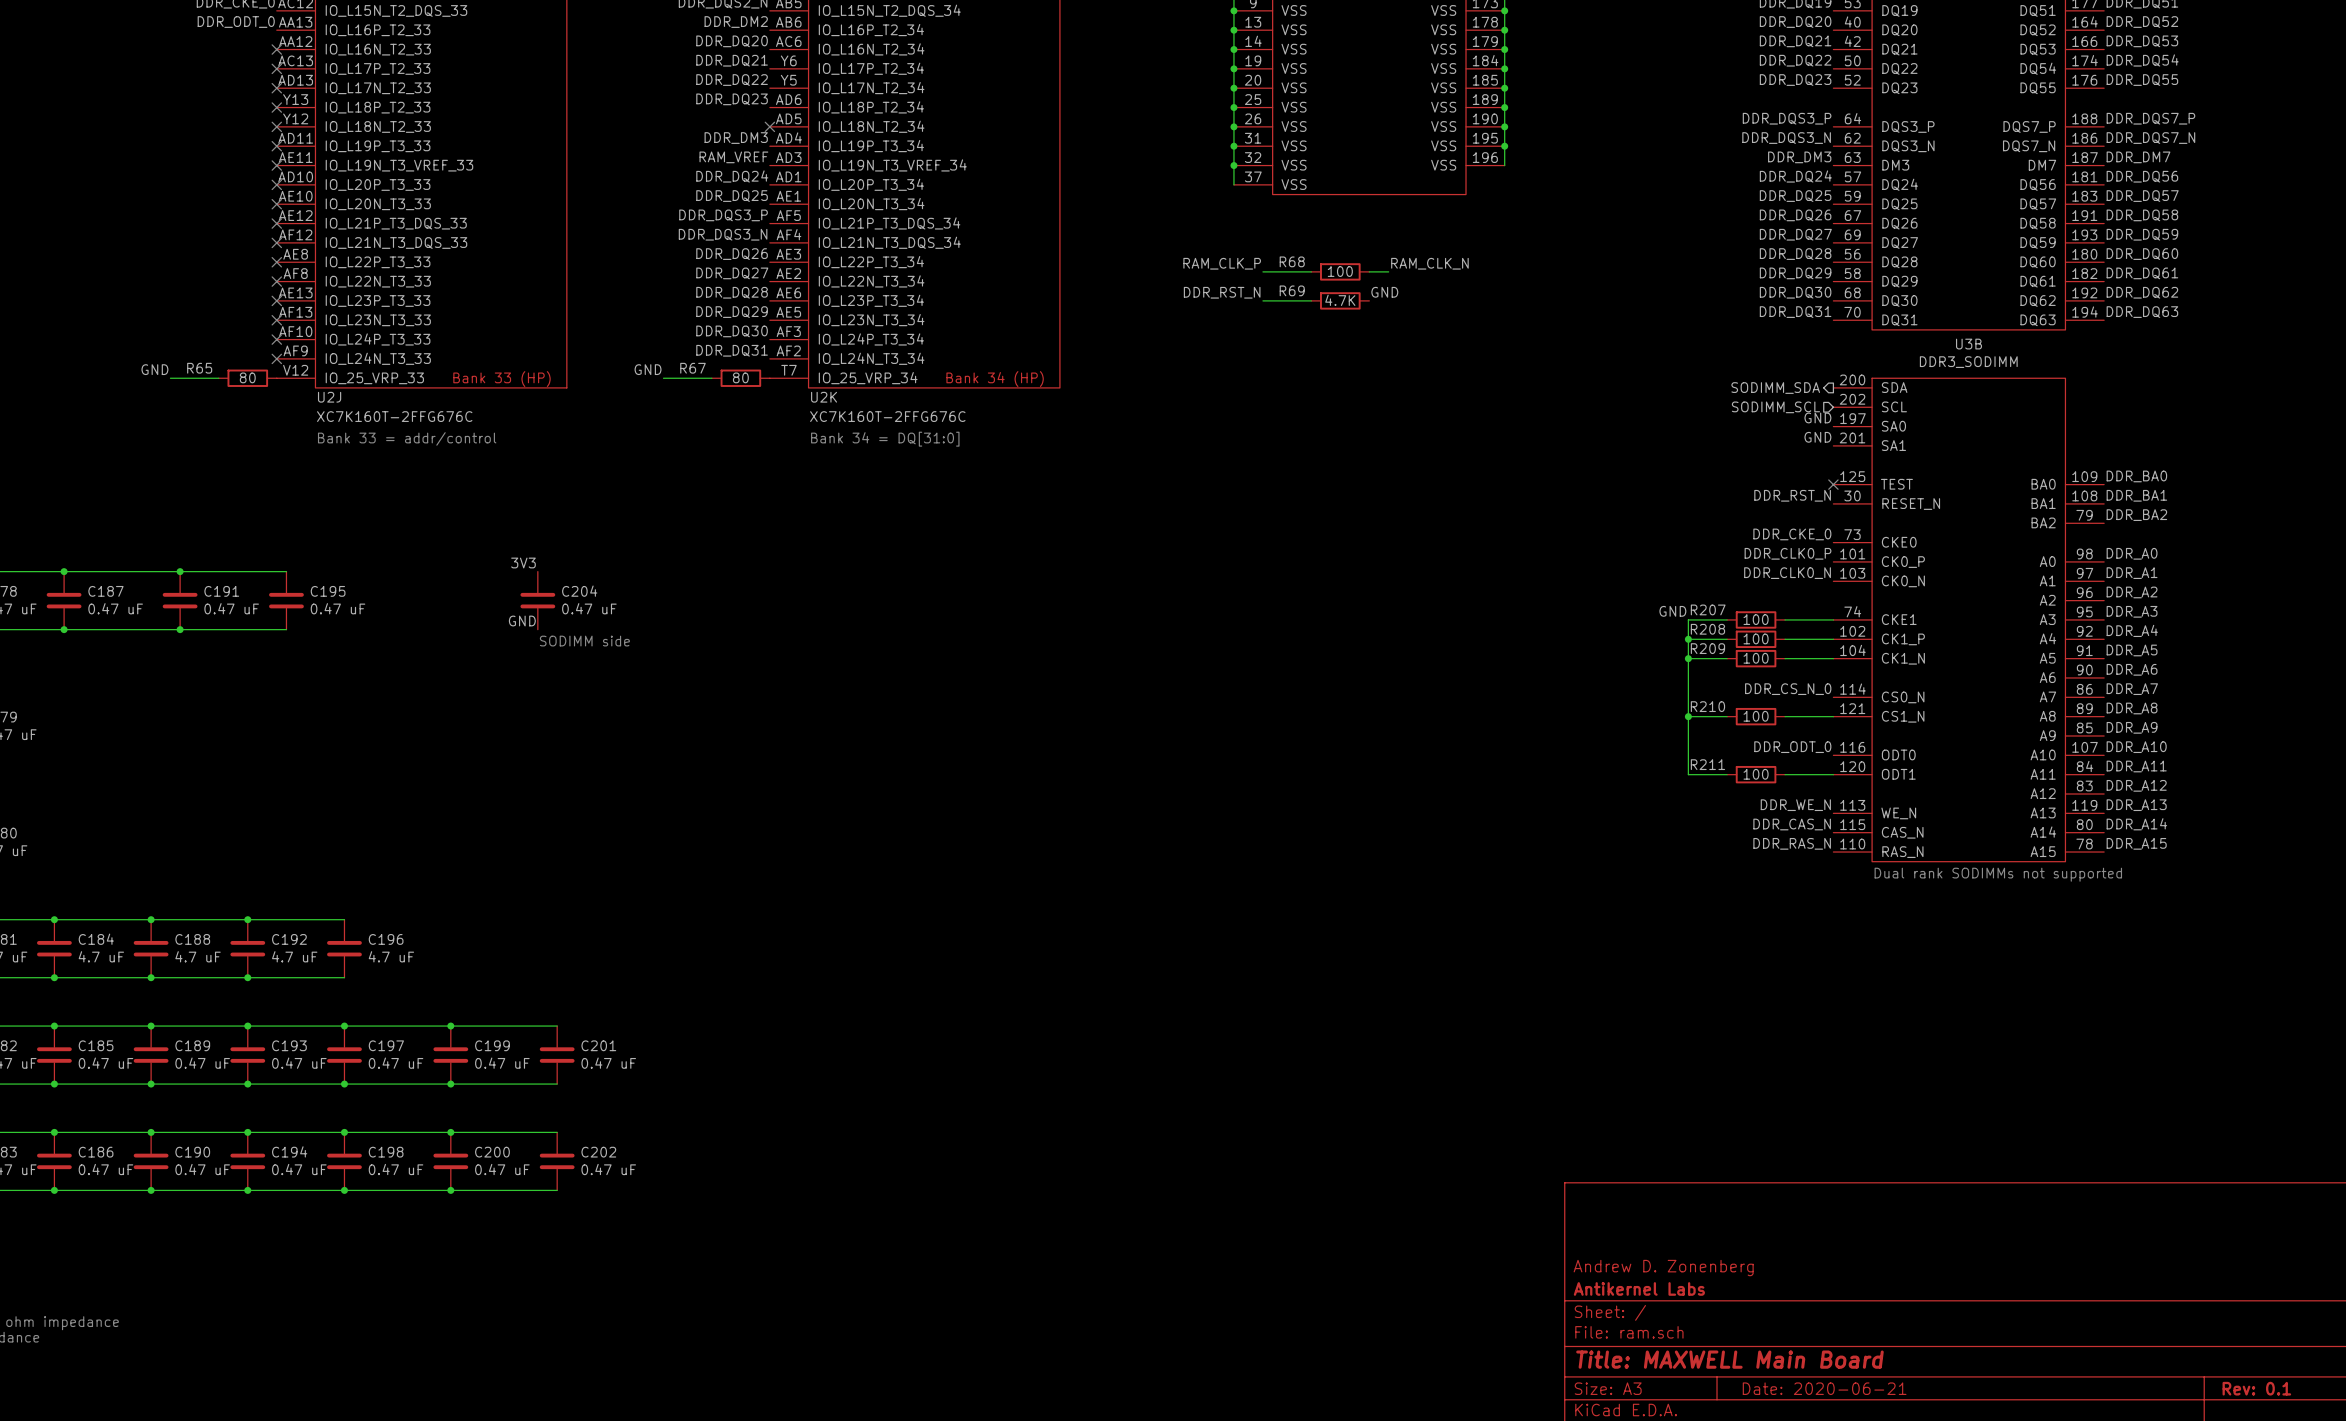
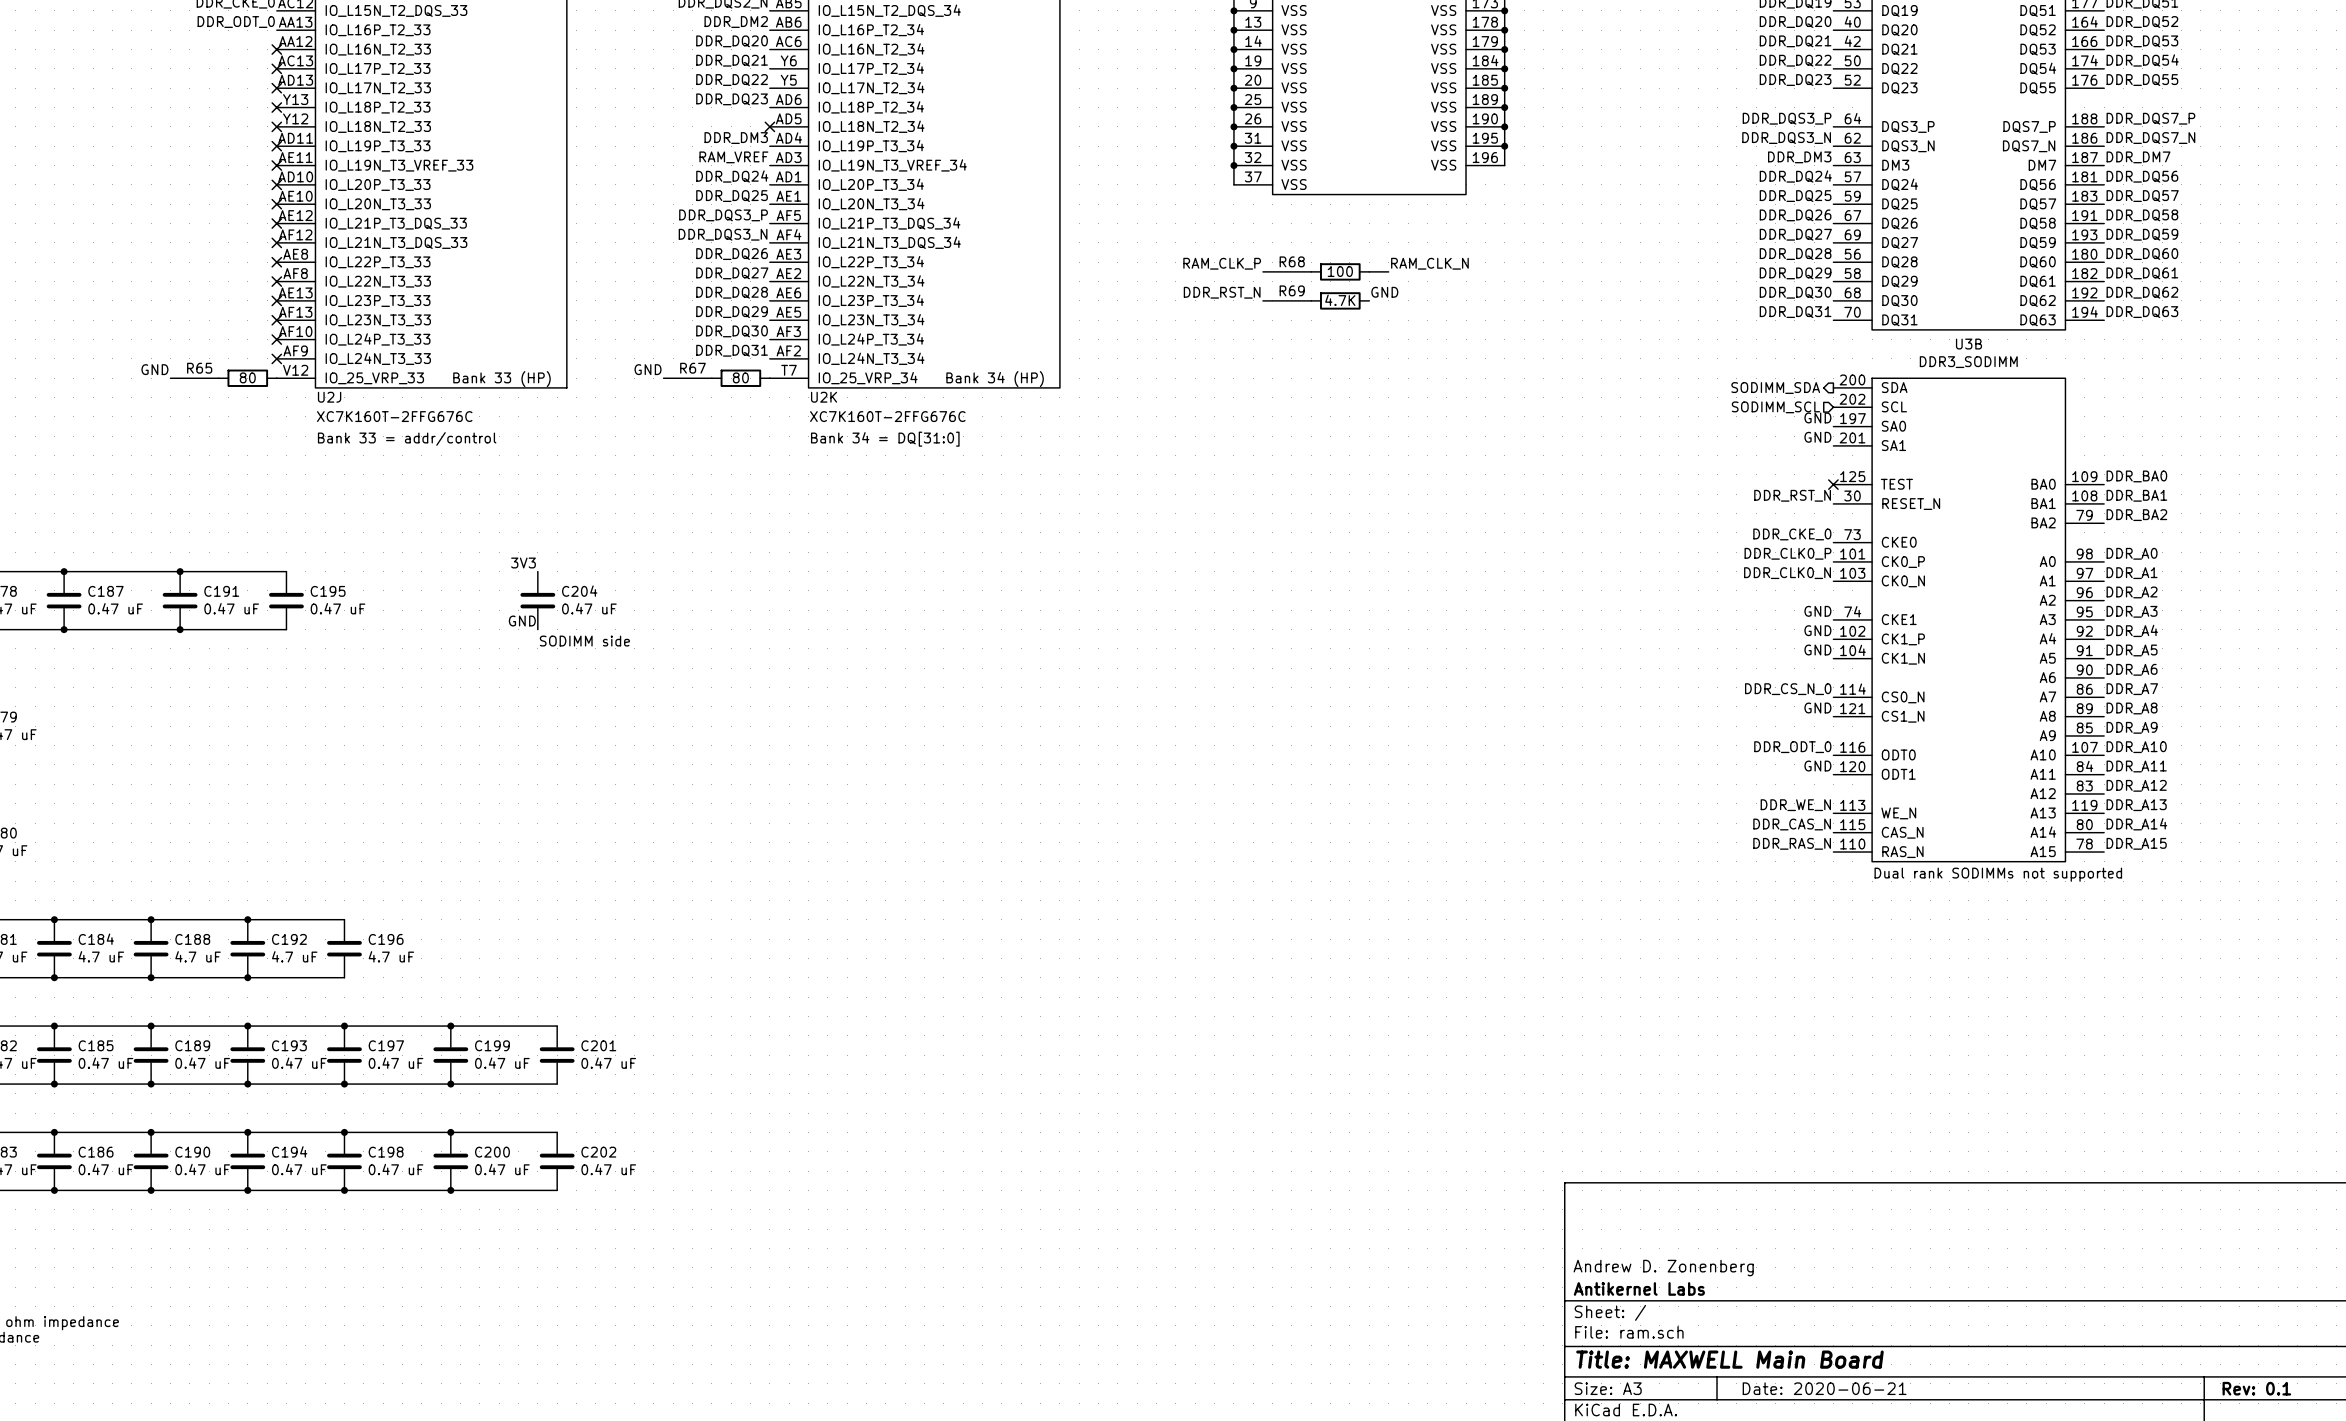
label: GND (1672, 611) -> none
label: none -> GND (1817, 611)
wire: (1727, 619) (1688, 619) (1688, 774) (1727, 774) -> none
R207: 100 (1756, 619) -> none
wire: (1785, 619) (1833, 619) -> none
label: none -> GND (1817, 630)
wire: (1688, 639) (1727, 639) -> none
junction: (1688, 639) -> none
R208: 100 (1756, 639) -> none
wire: (1785, 639) (1833, 639) -> none
label: none -> GND (1817, 650)
wire: (1688, 658) (1727, 658) -> none
junction: (1688, 658) -> none
R209: 100 (1756, 658) -> none
wire: (1785, 658) (1833, 658) -> none
label: none -> GND (1817, 708)
wire: (1688, 716) (1727, 716) -> none
junction: (1688, 716) -> none
R210: 100 (1756, 716) -> none
wire: (1785, 716) (1833, 716) -> none
label: none -> GND (1817, 766)
R211: 100 (1756, 774) -> none
wire: (1785, 774) (1833, 774) -> none

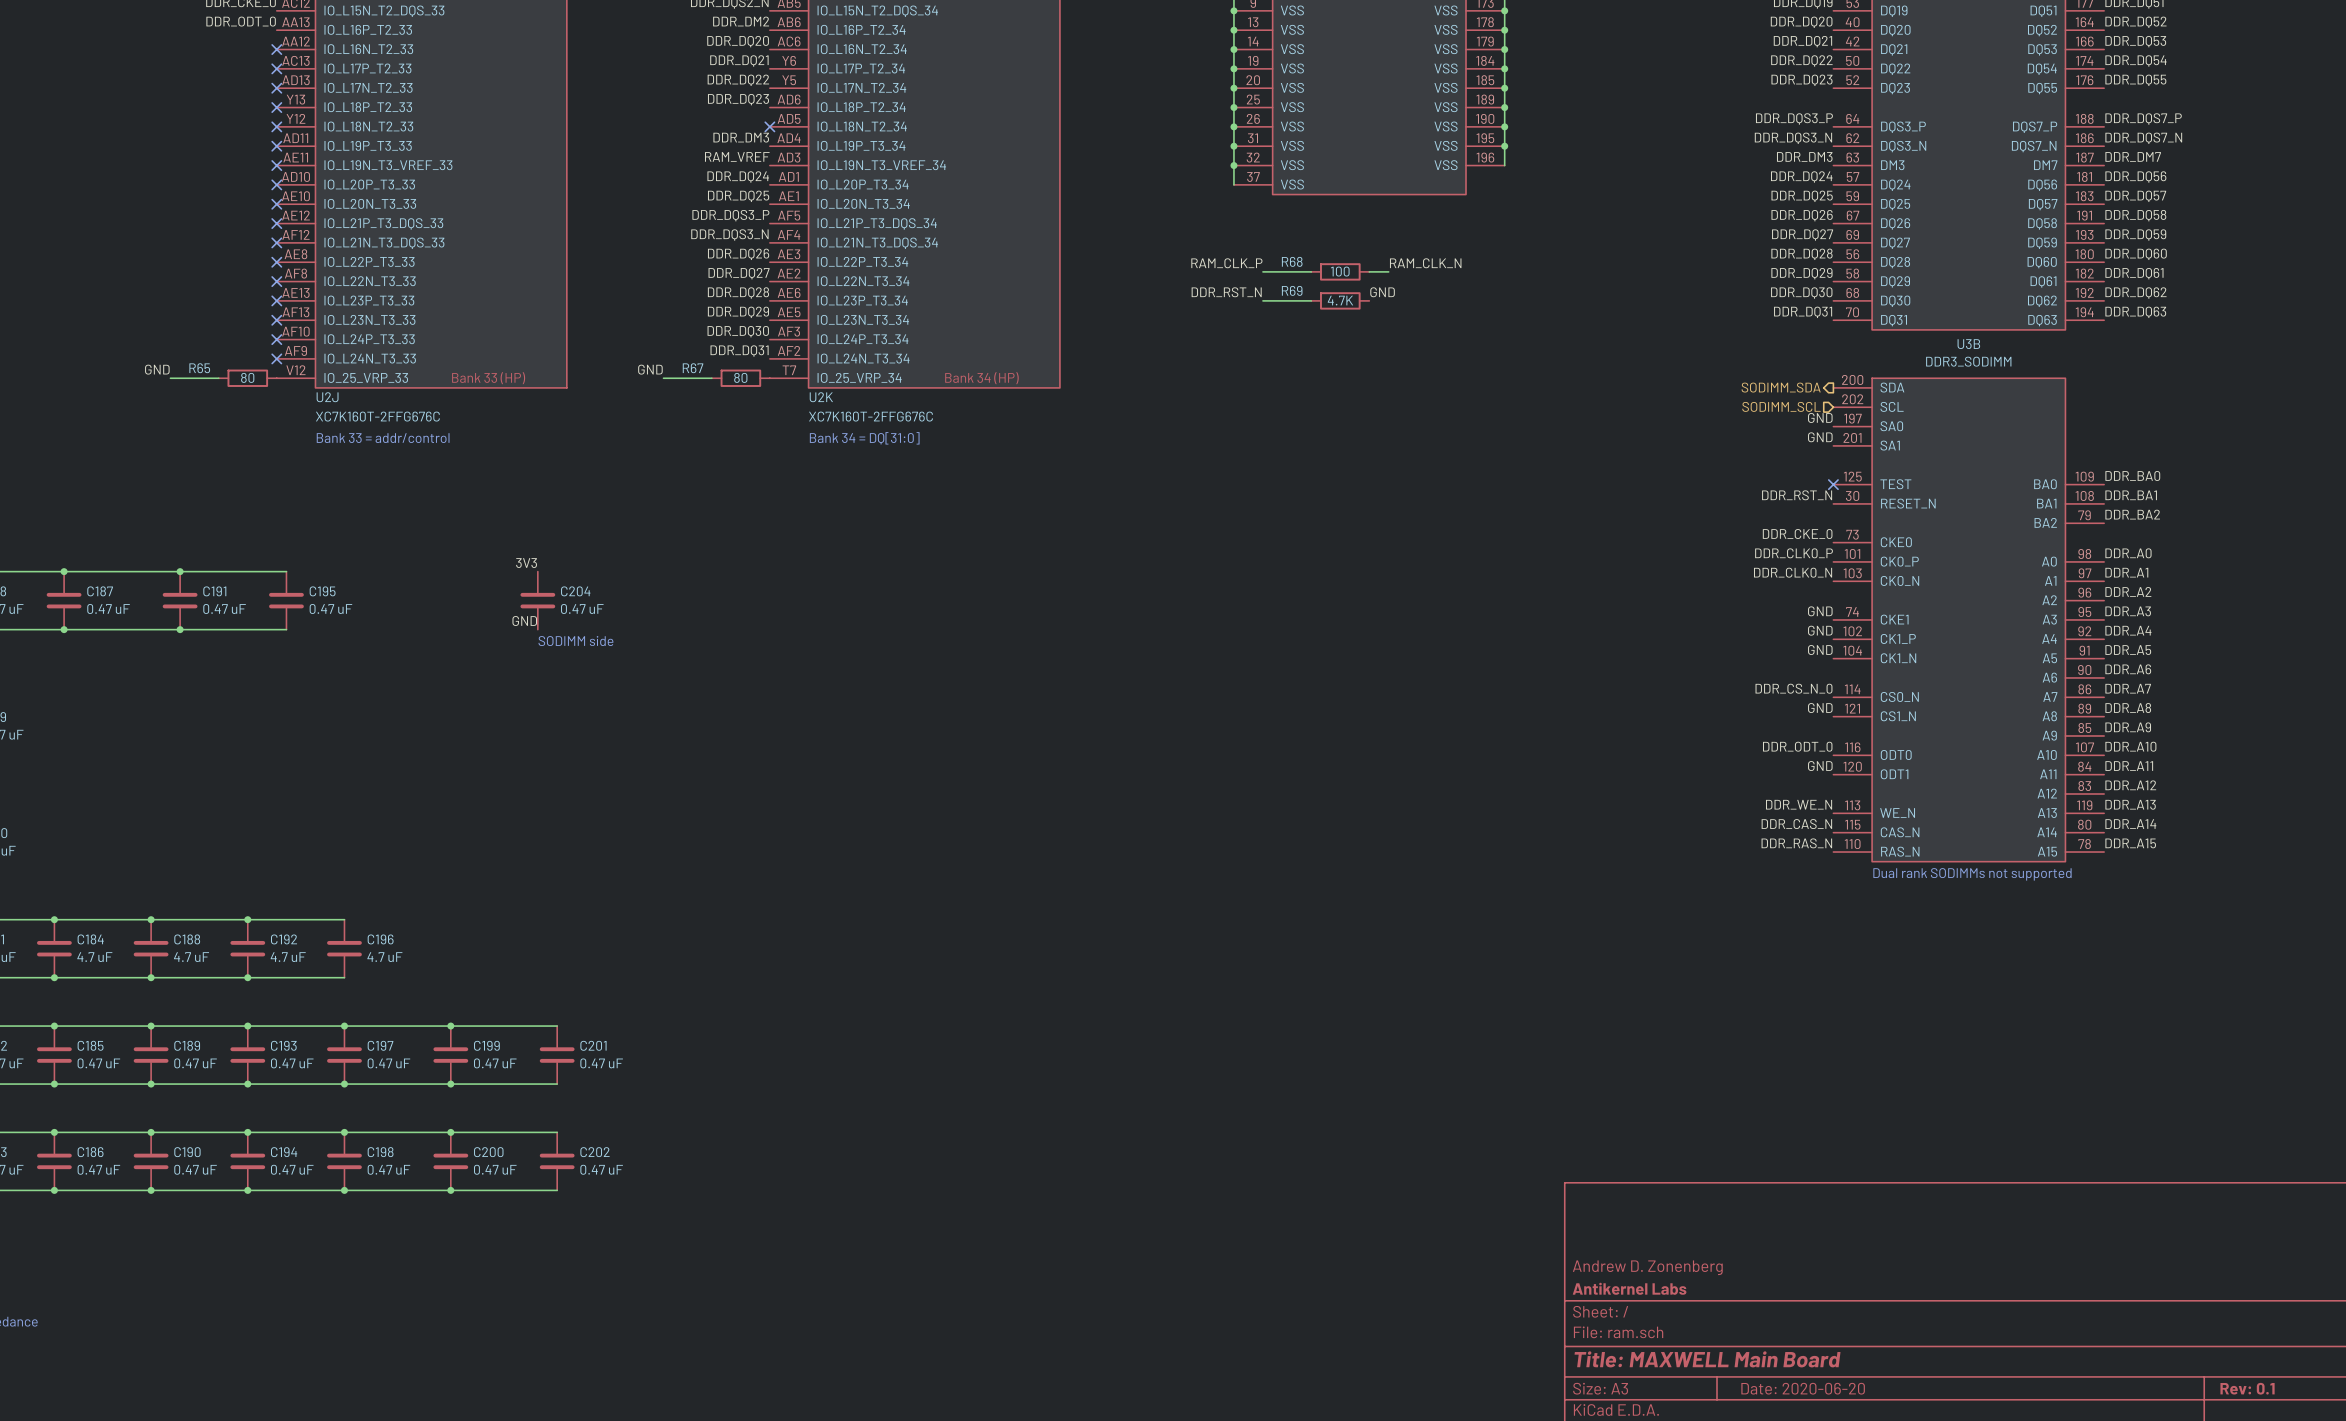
title block: Date: 2020-06-21 (1824, 1388) -> Date: 2020-06-20 (1803, 1388)

